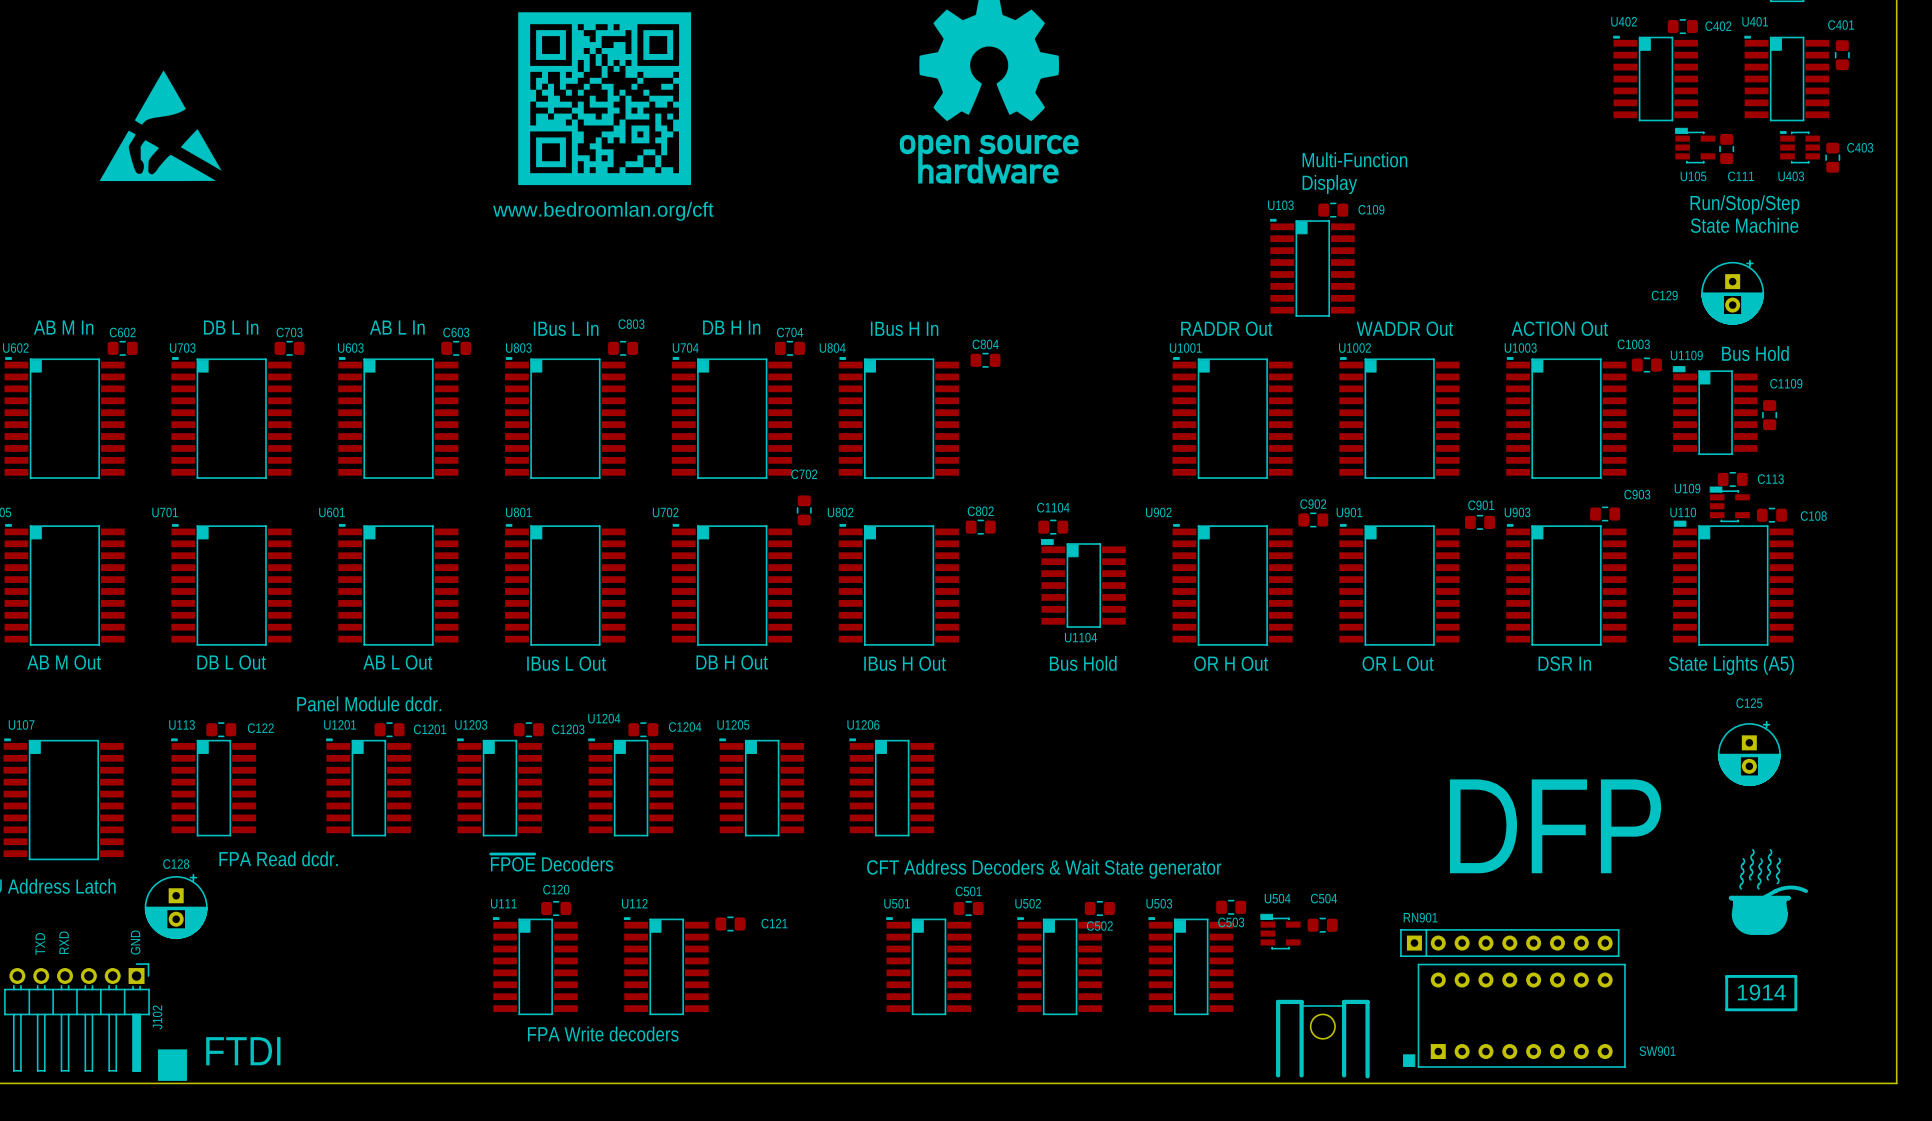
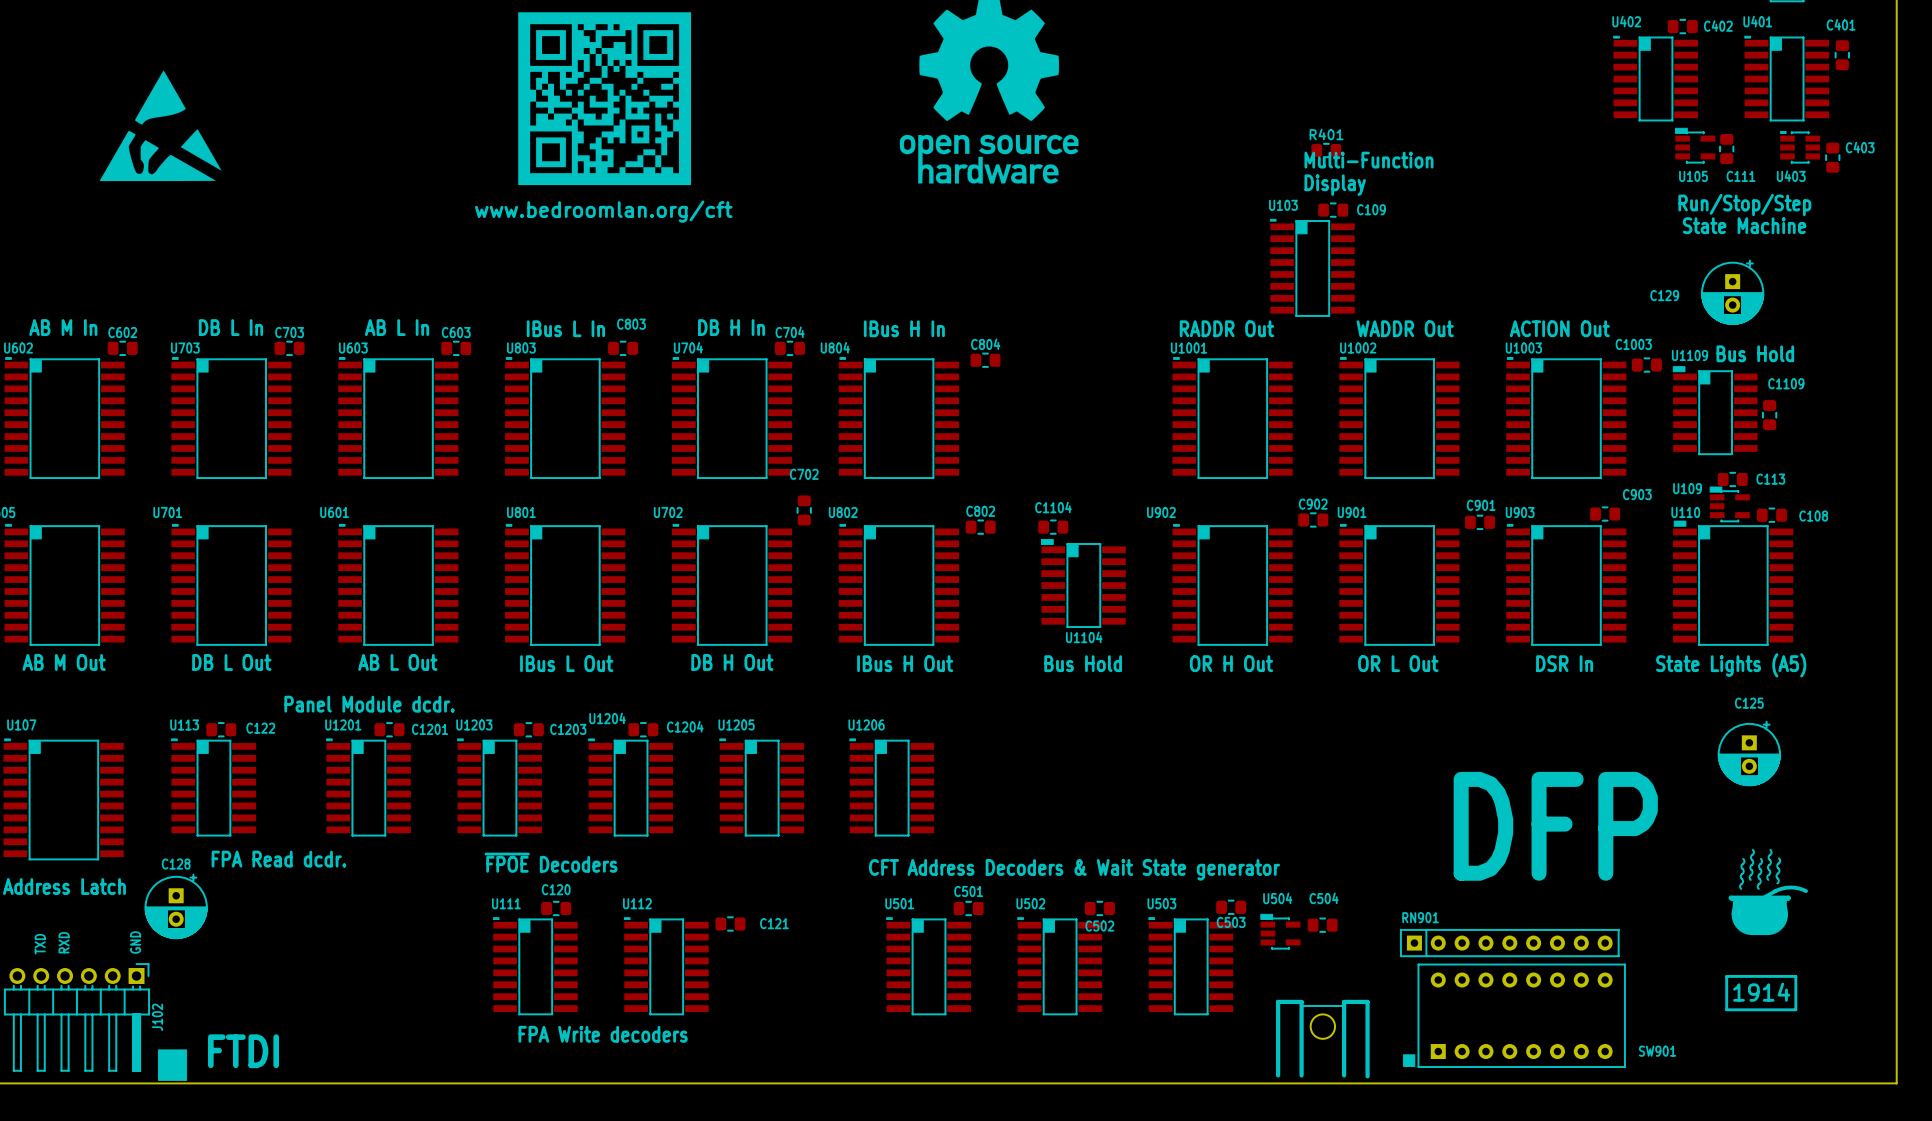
R401: none -> (1326, 150)

